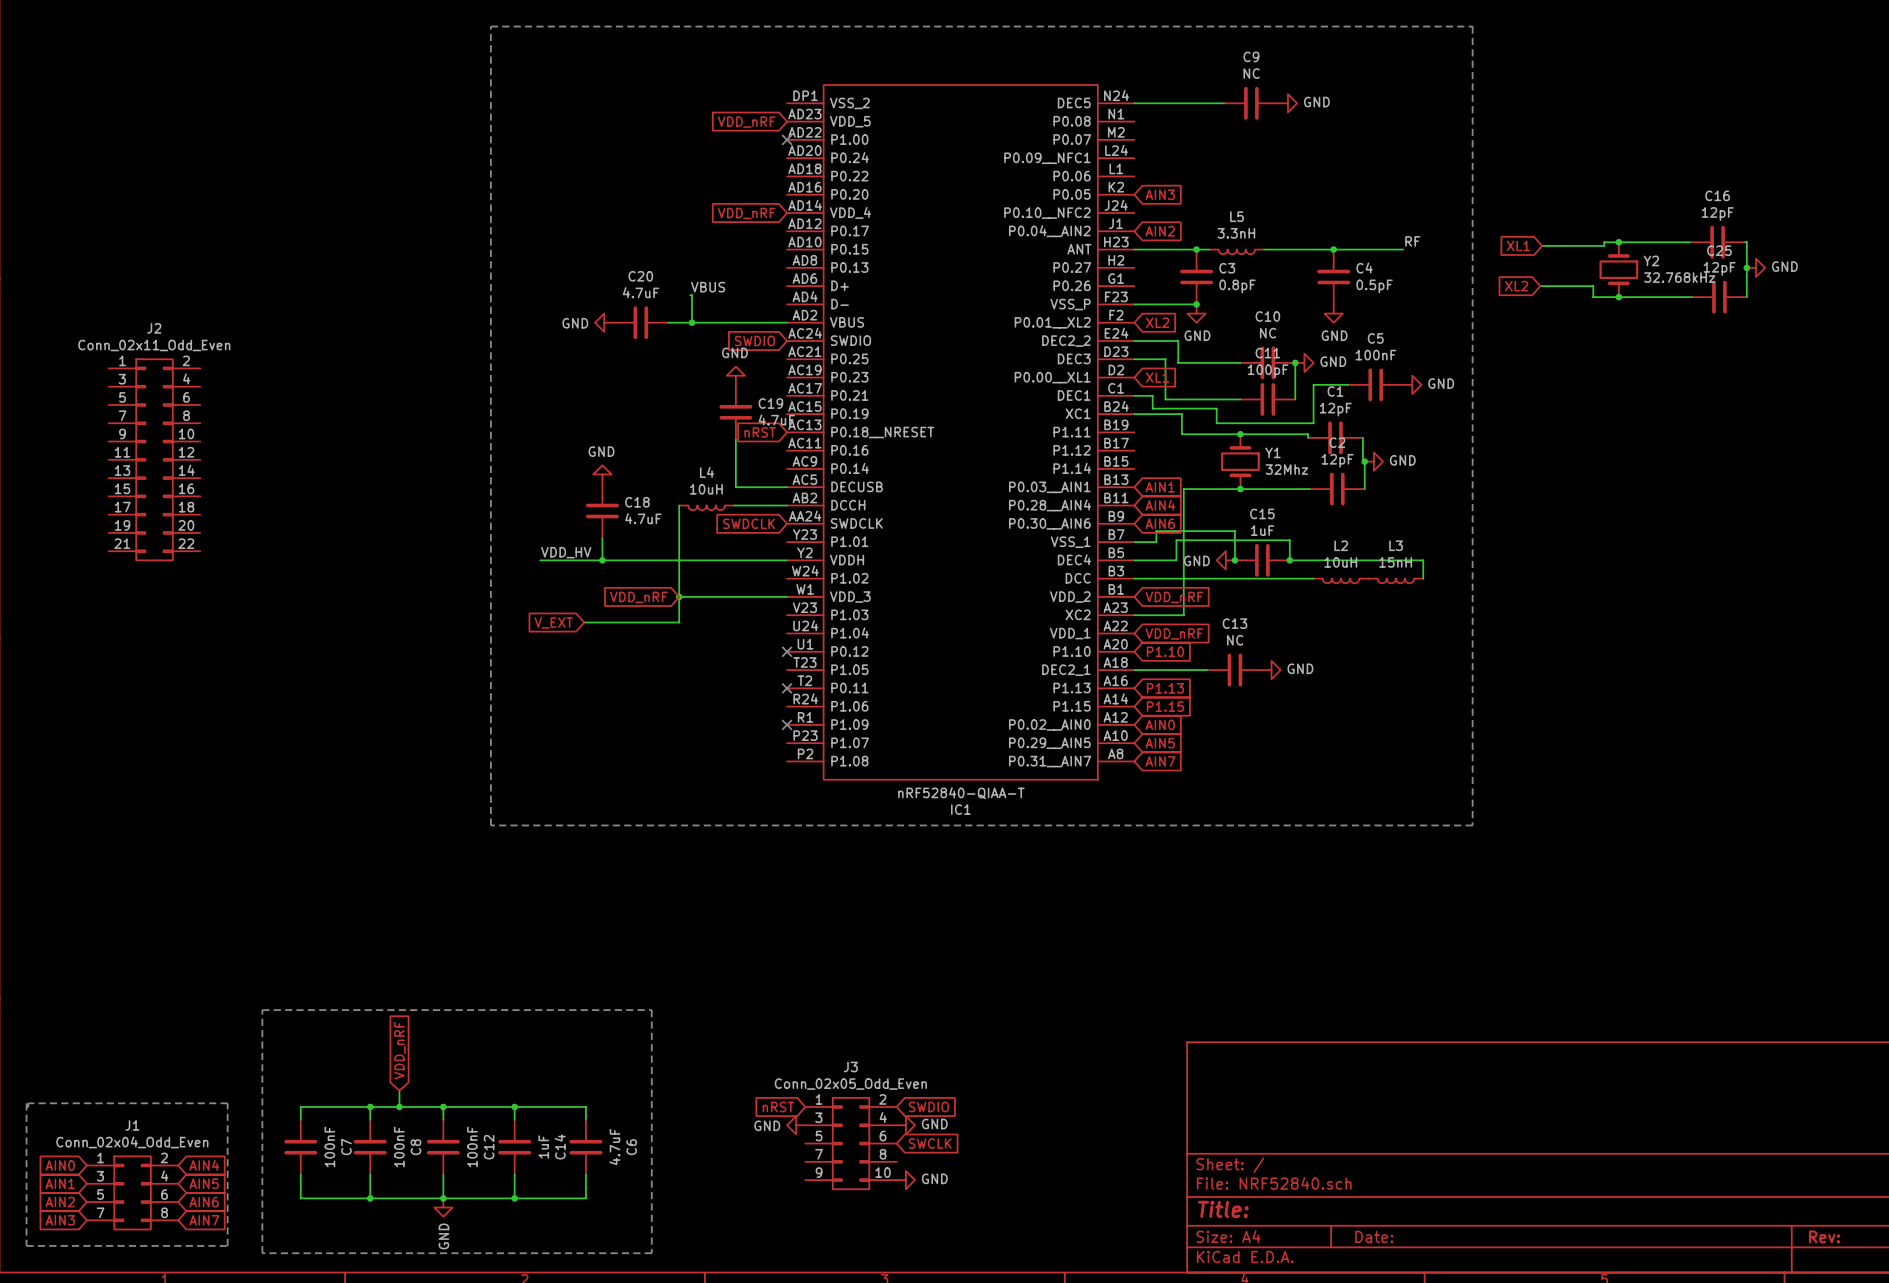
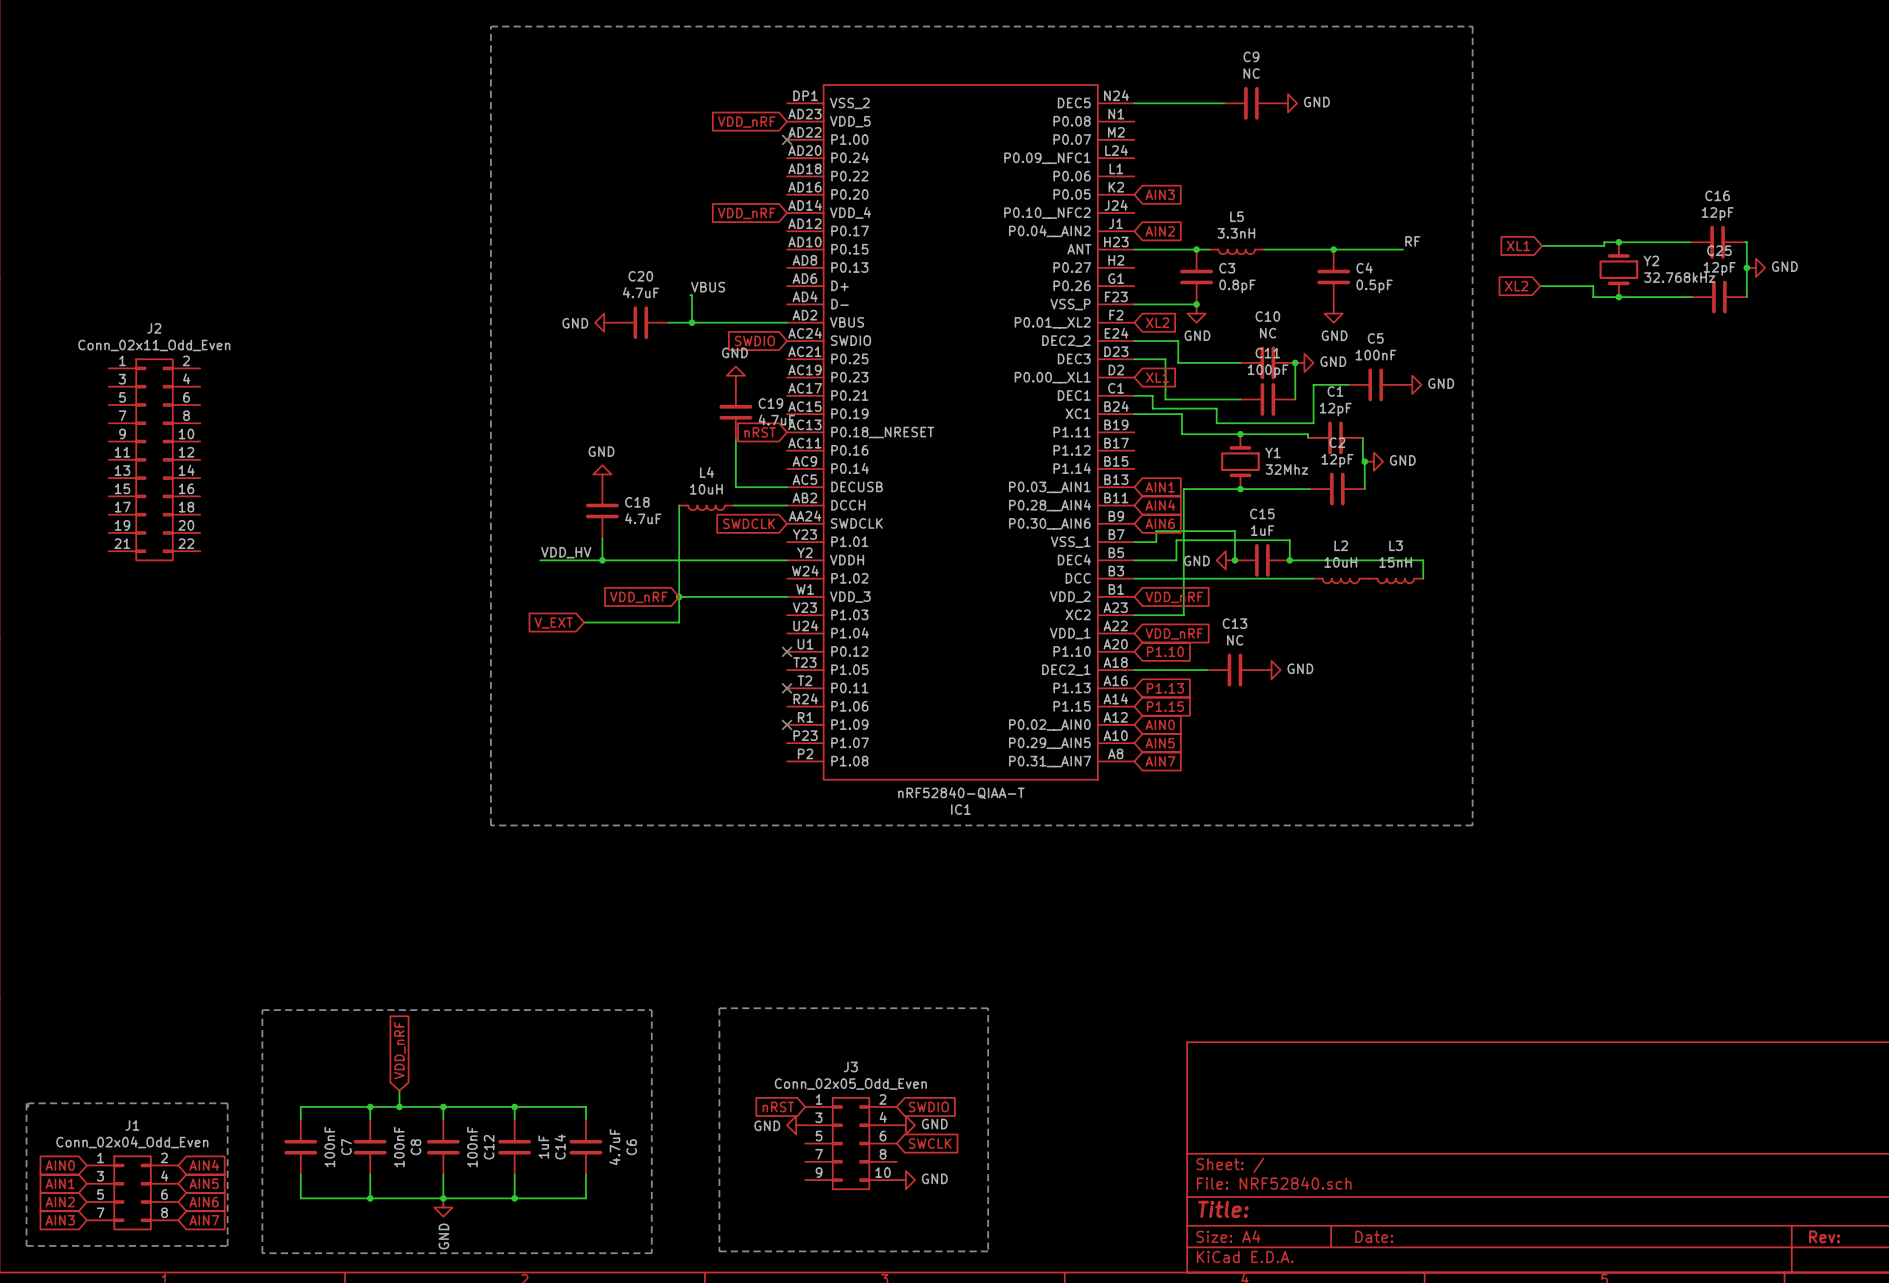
line: none -> (988, 1249) (988, 1008) (719, 1008) (719, 1251) (988, 1251)

